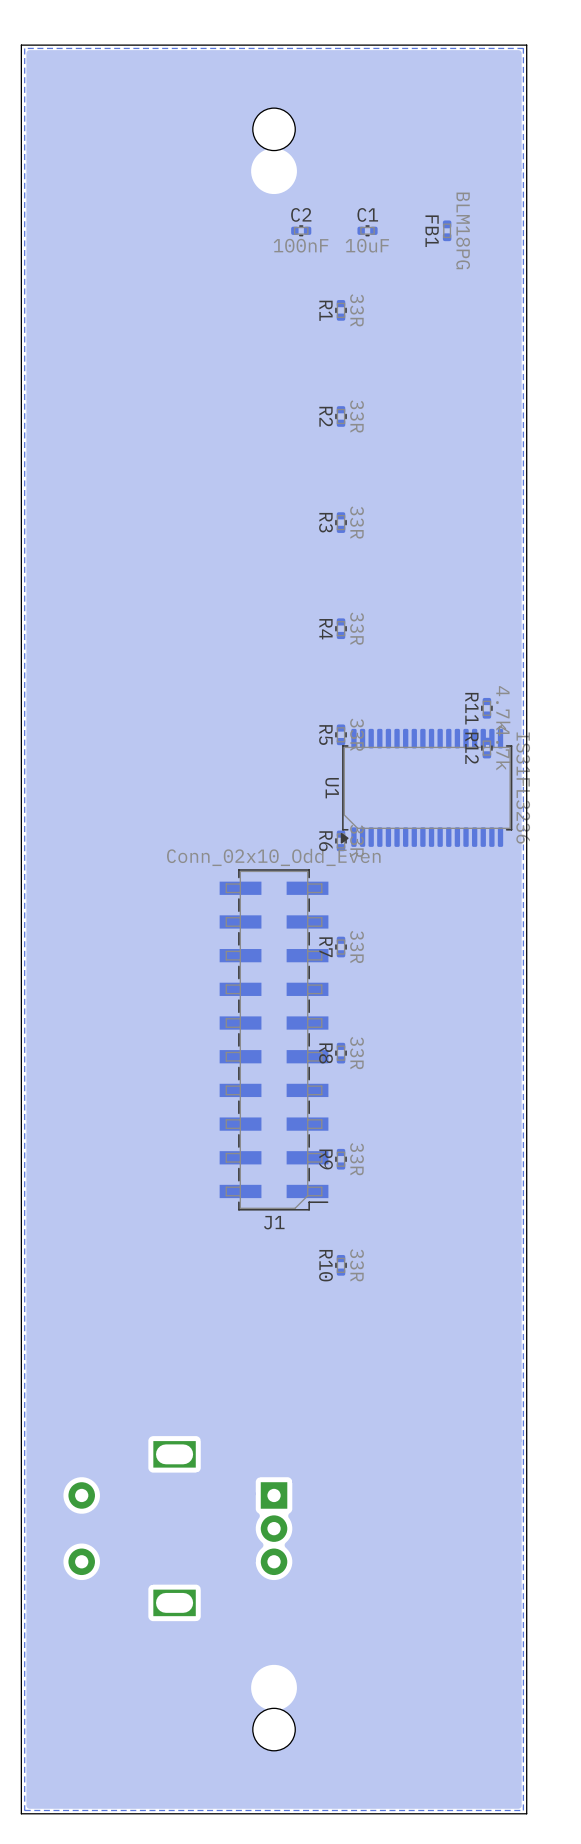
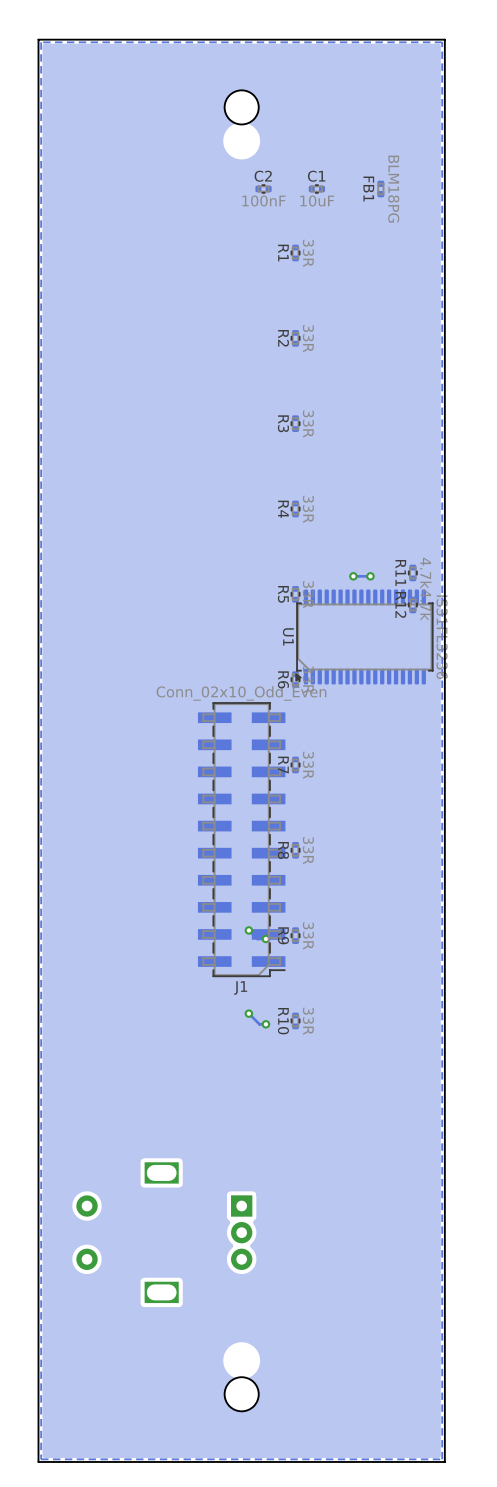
via: none -> (353, 576)
track: none -> (370, 576) (353, 576)
via: none -> (370, 576)
via: none -> (248, 930)
via: none -> (265, 938)
track: none -> (248, 1013) (259, 1024) (265, 1024)
via: none -> (248, 1013)
via: none -> (265, 1024)

